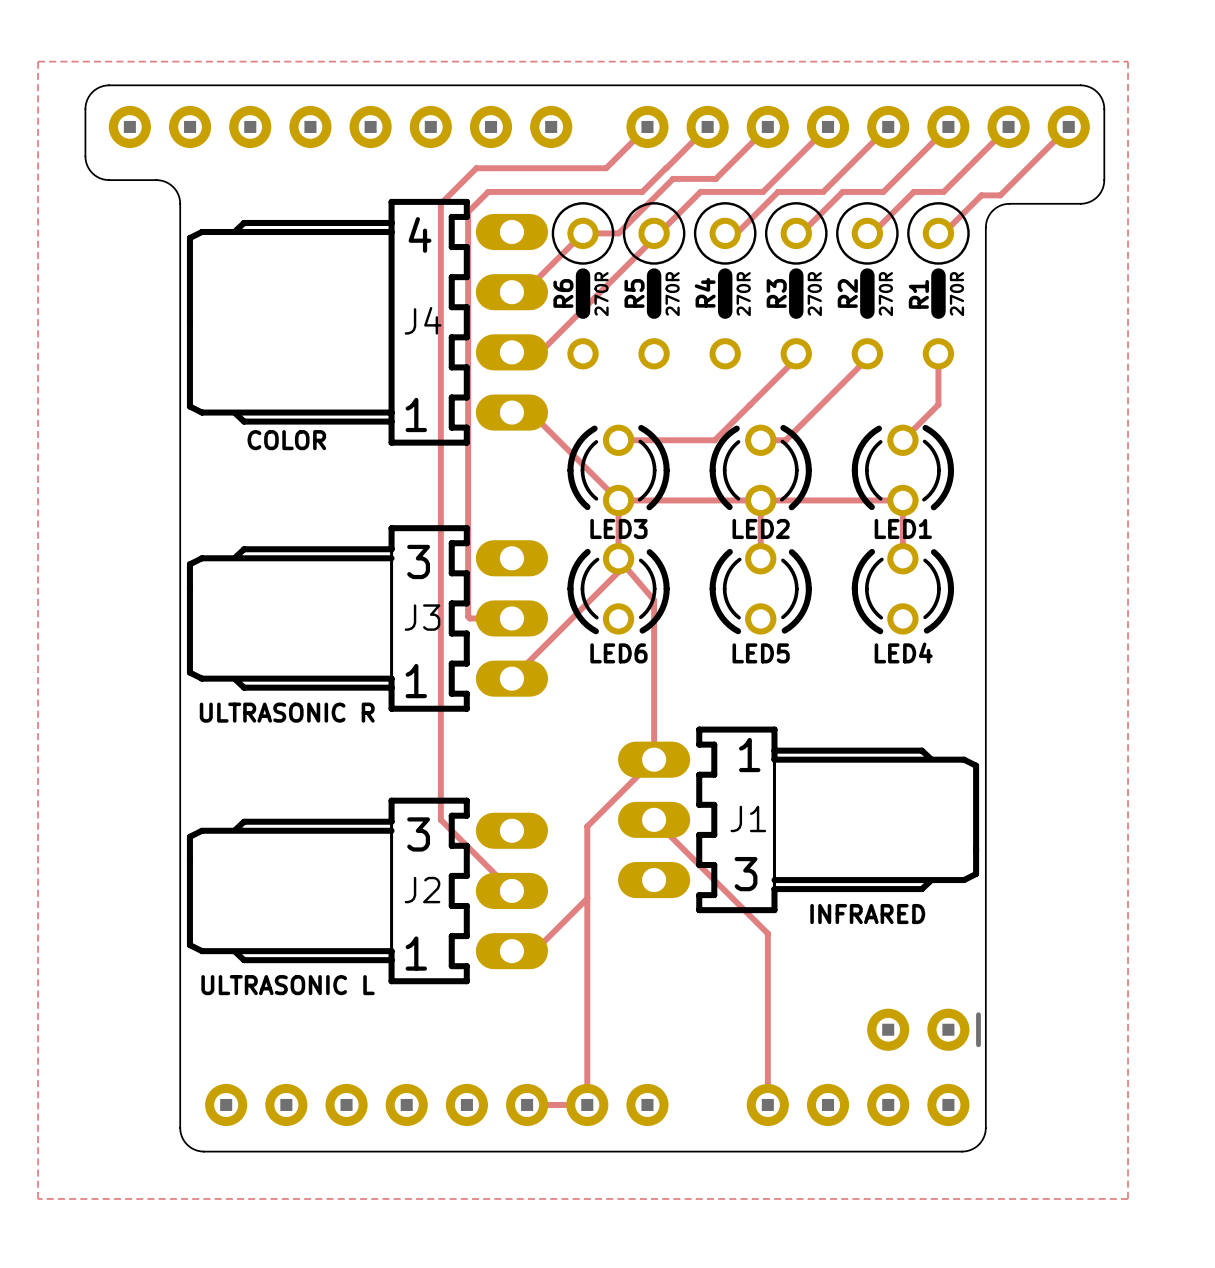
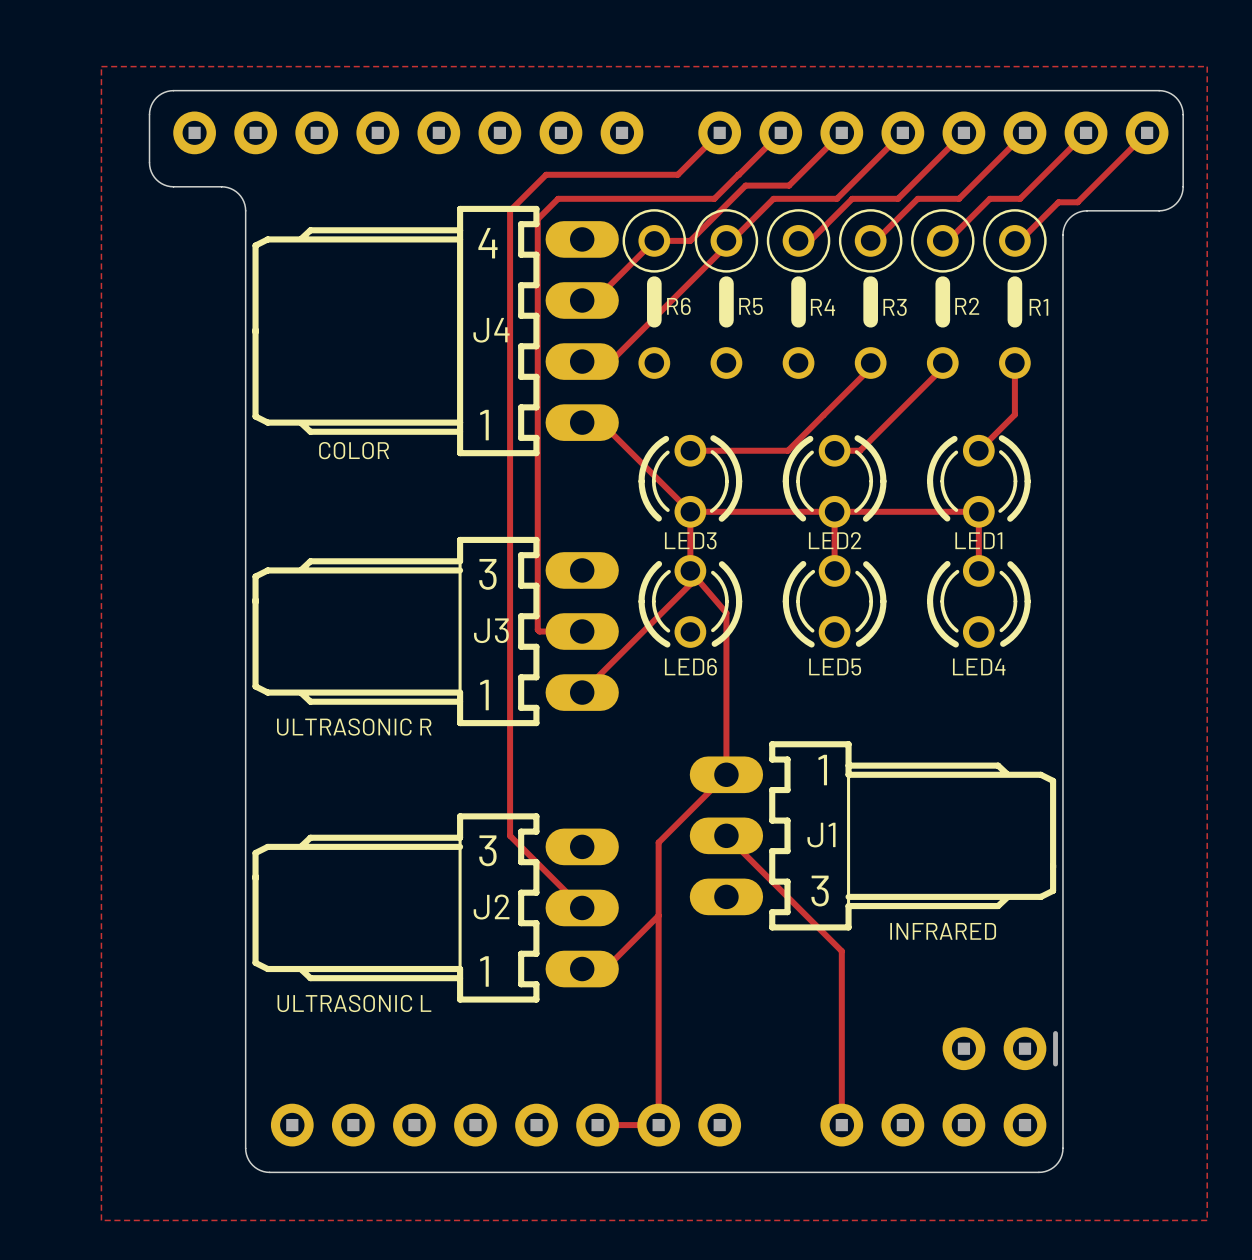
R4 name rotation: 0° (705, 292) -> 90° clockwise (822, 307)
R4 name position: R4 (705, 292) -> R4 (822, 307)
R6 name rotation: 0° (563, 293) -> 90° clockwise (678, 306)
R6 name position: R6 (563, 293) -> R6 (678, 306)
R5 name rotation: 0° (634, 293) -> 90° clockwise (751, 306)
R5 name position: R5 (634, 293) -> R5 (751, 306)
R3 name rotation: 0° (776, 293) -> 90° clockwise (895, 307)
R3 name position: R3 (776, 293) -> R3 (895, 307)
R2 name rotation: 0° (847, 293) -> 90° clockwise (967, 306)
R2 name position: R2 (847, 293) -> R2 (967, 306)
R6 value: 270R (601, 294) -> none
R5 value: 270R (672, 294) -> none
R4 value: 270R (743, 294) -> none
R3 value: 270R (814, 294) -> none
R2 value: 270R (885, 294) -> none
R1 name rotation: 0° (918, 294) -> 90° clockwise (1038, 307)
R1 name position: R1 (918, 294) -> R1 (1038, 307)
R1 value: 270R (956, 294) -> none

